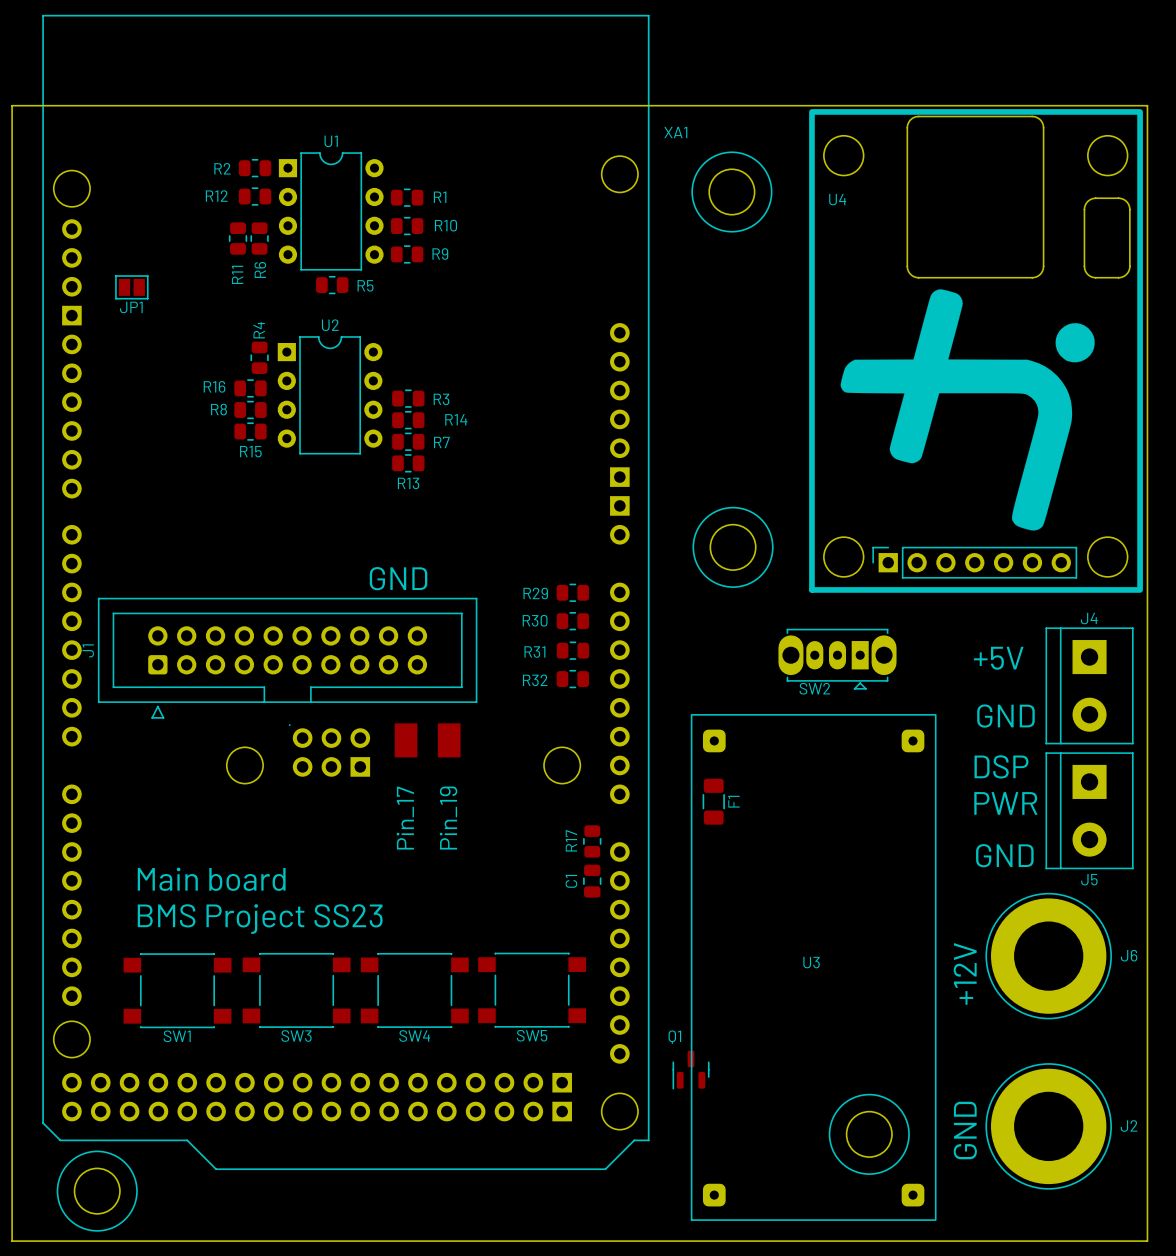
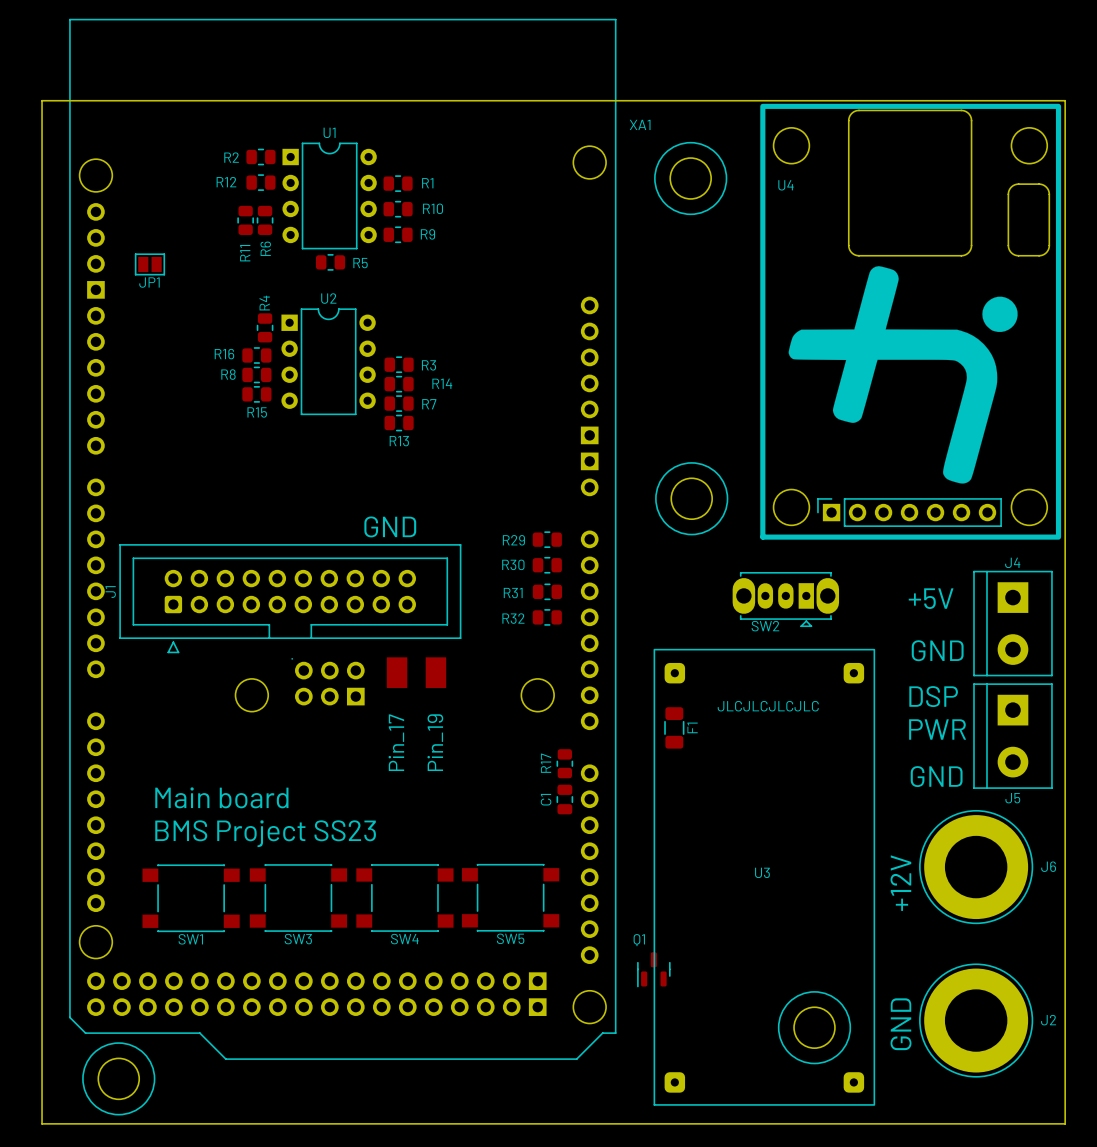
text: none -> JLCJLCJLCJLC (768, 706)

